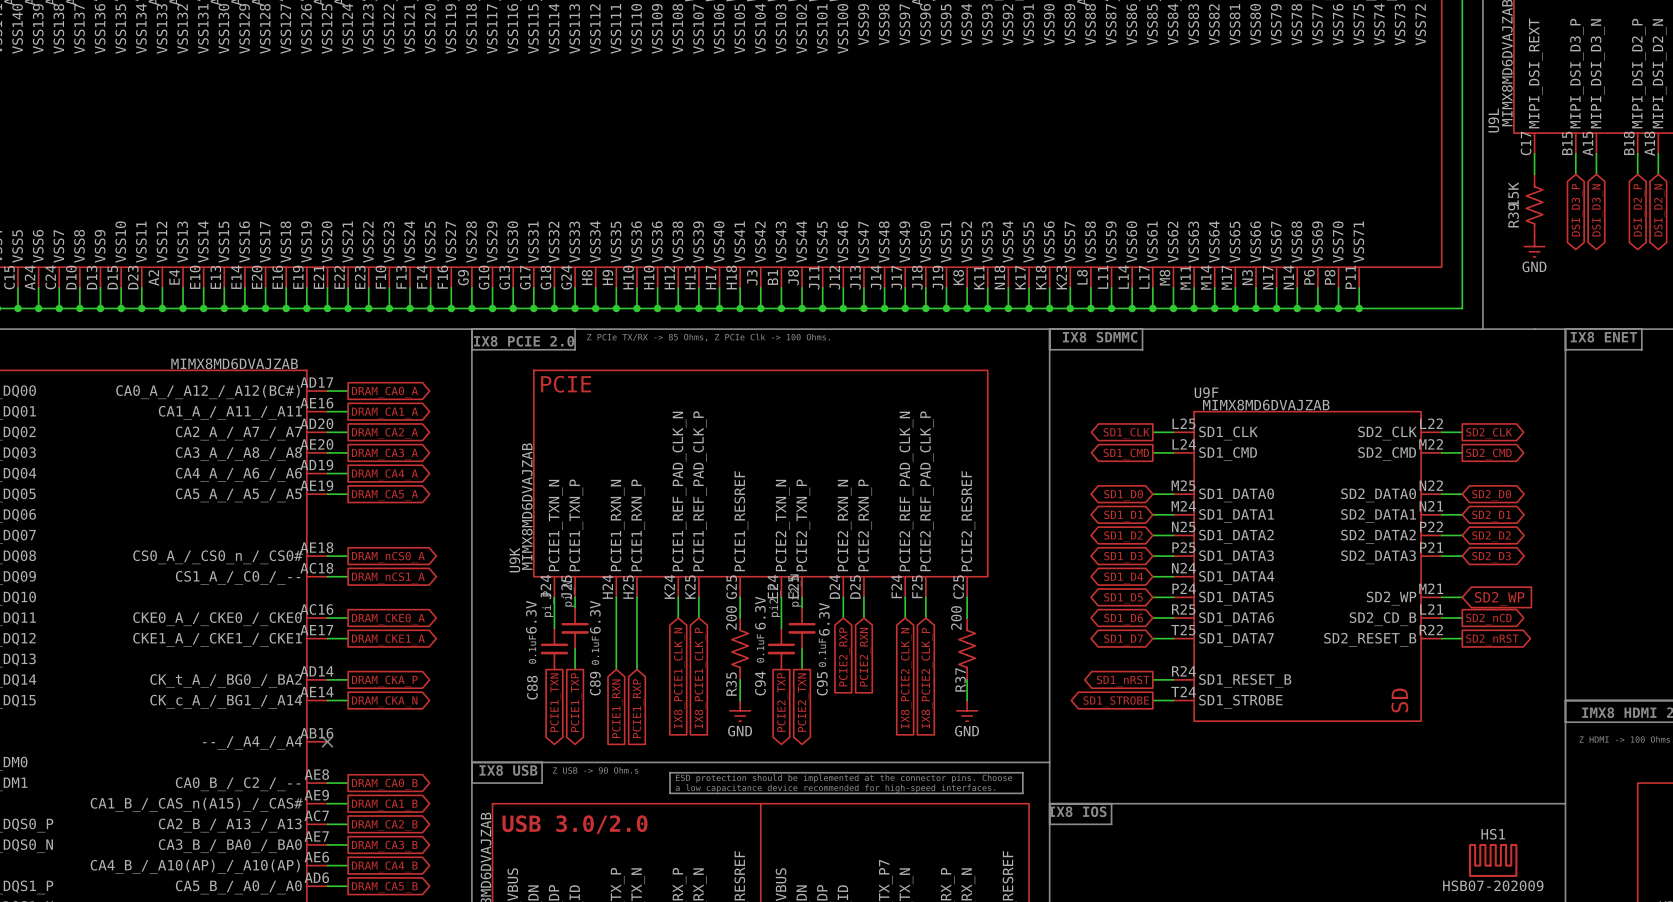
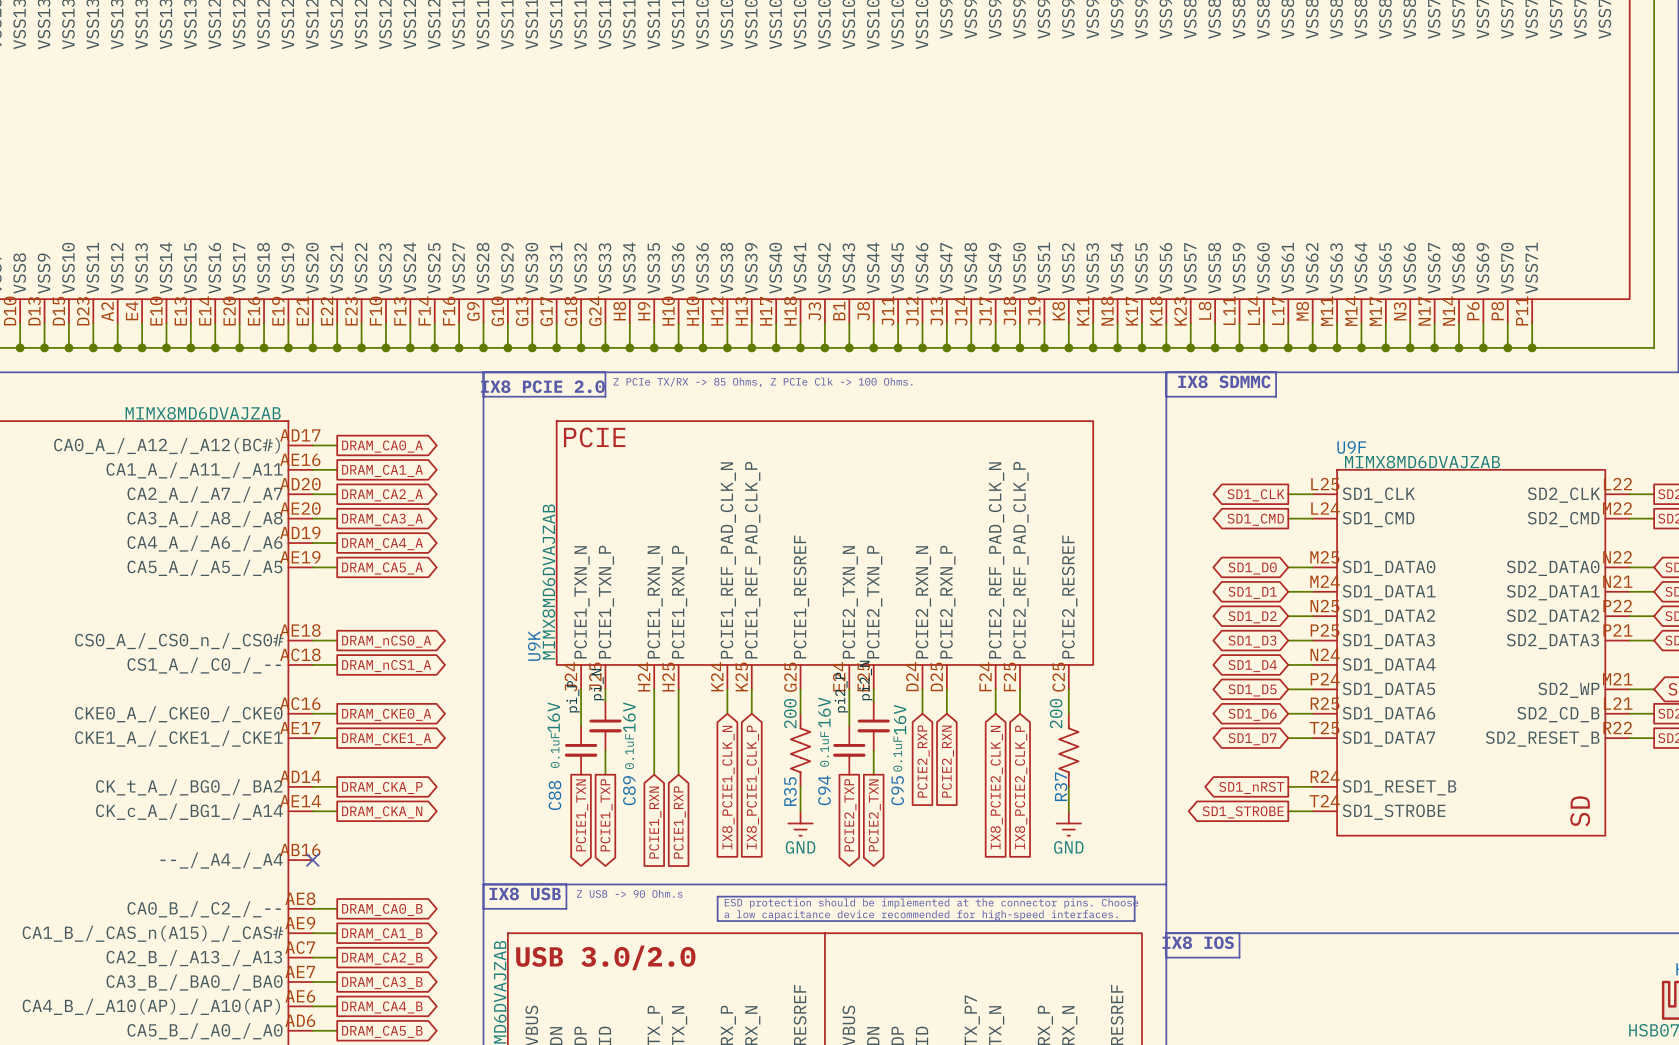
C94 text: 6.3V (760, 613) -> 16V (824, 712)
C88 text: 6.3V (531, 617) -> 16V (553, 717)
C89 text: 6.3V (595, 617) -> 16V (629, 717)
C95 text: 6.3V (824, 619) -> 16V (900, 719)

